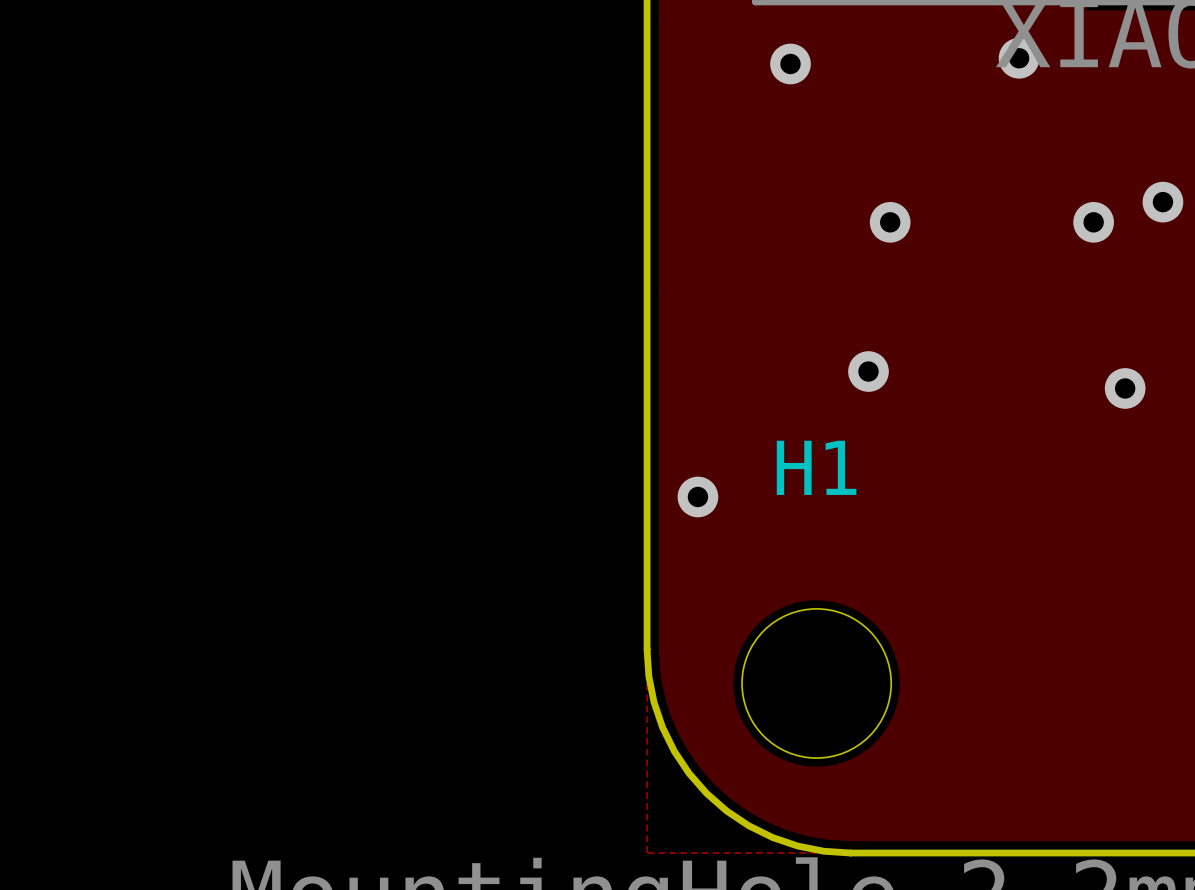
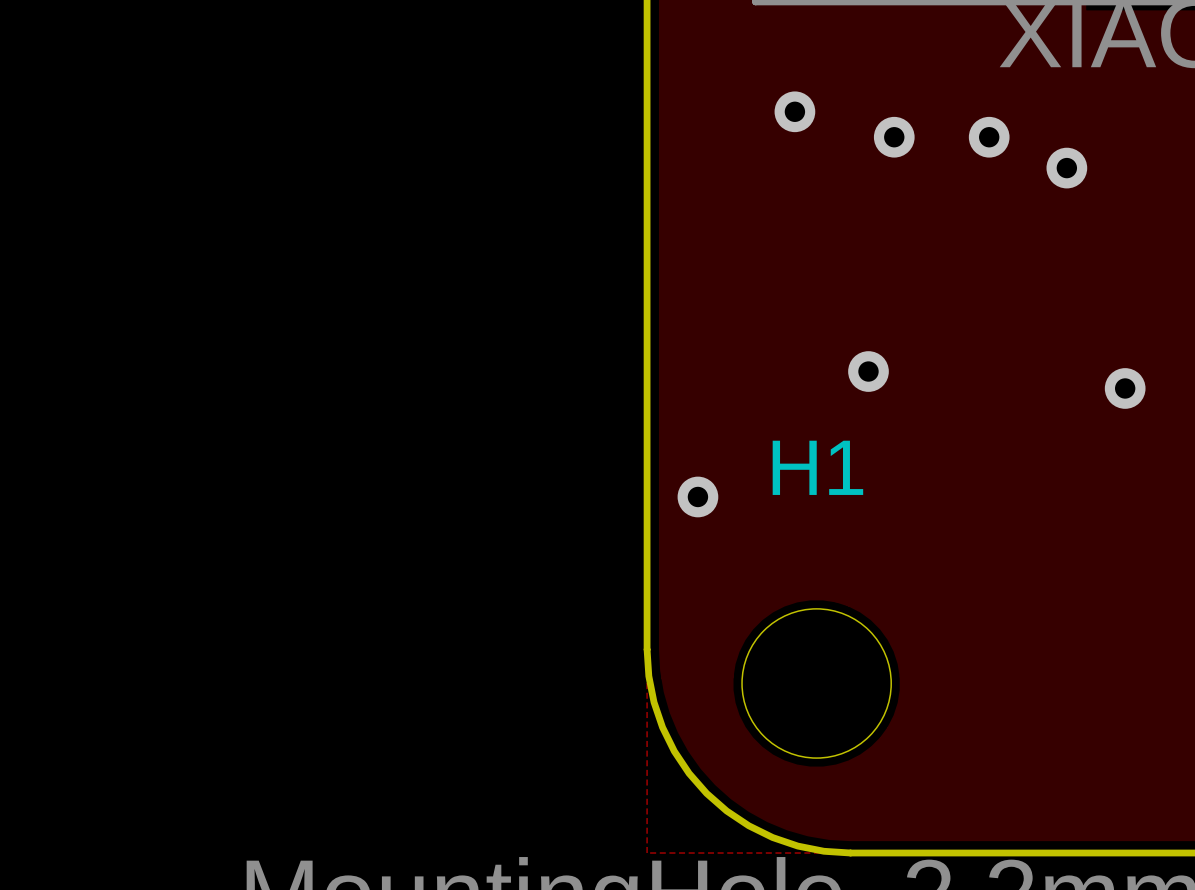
via: (1019, 58) -> none
via position: (790, 63) -> (794, 111)
via: none -> (894, 137)
via: none -> (989, 137)
via: none -> (1066, 168)
via: (1162, 202) -> none
via: (890, 222) -> none
via: (1093, 222) -> none

